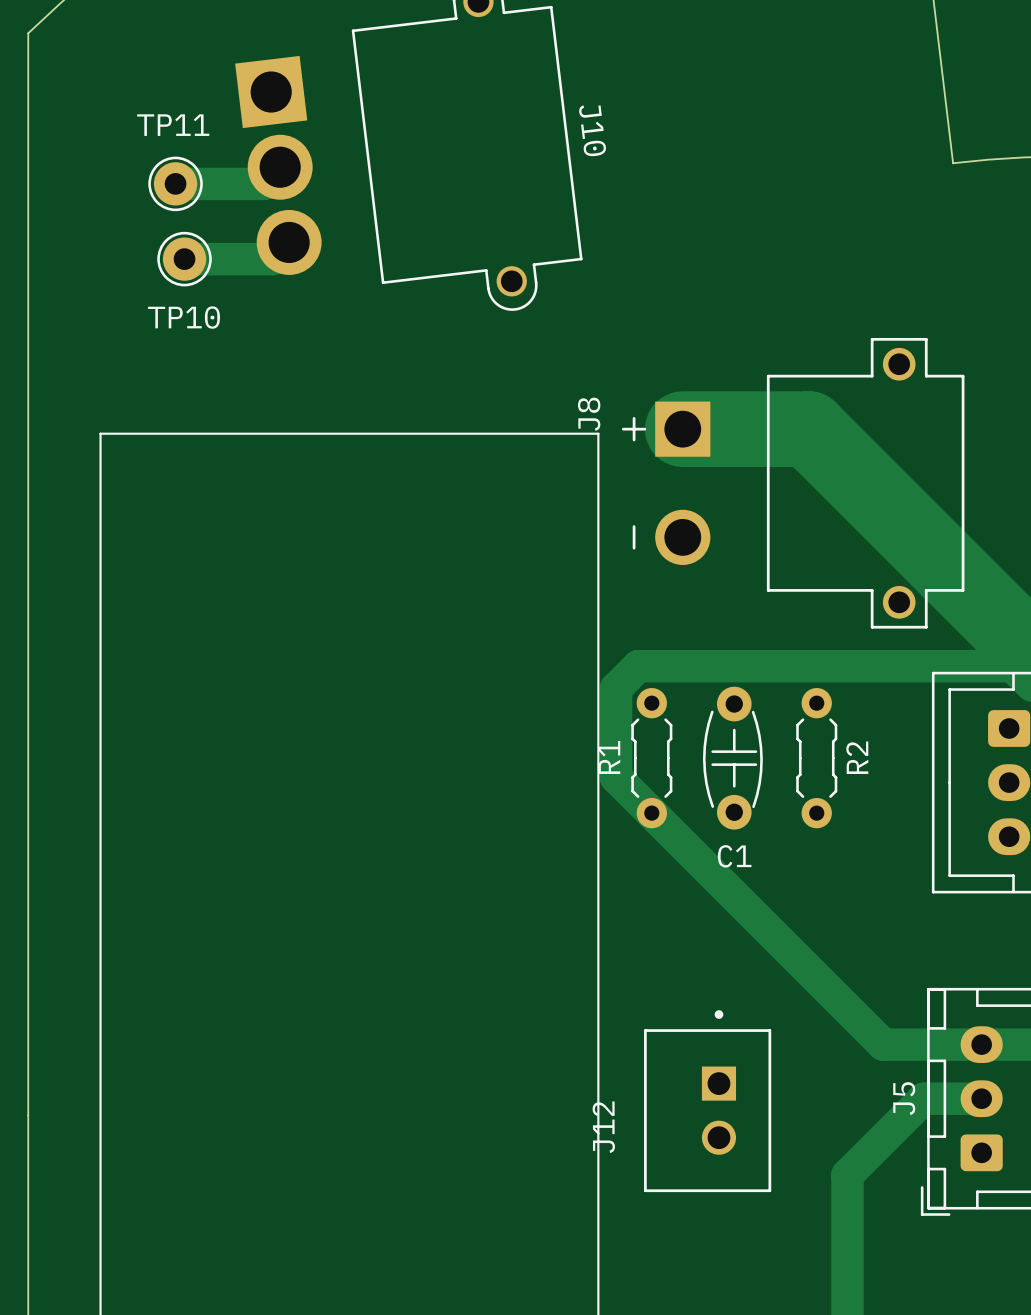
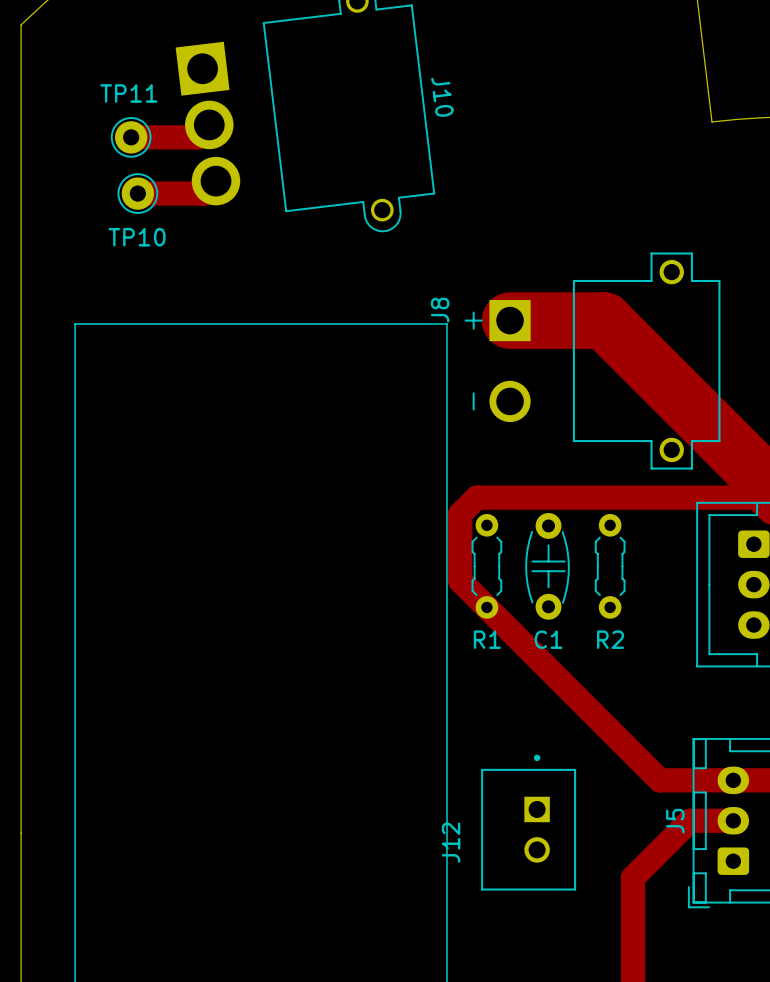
R1 name rotation: 0° (609, 757) -> 90° clockwise (487, 639)
R1 name position: R1 (609, 757) -> R1 (487, 639)
R2 name rotation: 0° (857, 757) -> 90° clockwise (610, 639)
R2 name position: R2 (857, 757) -> R2 (610, 639)

